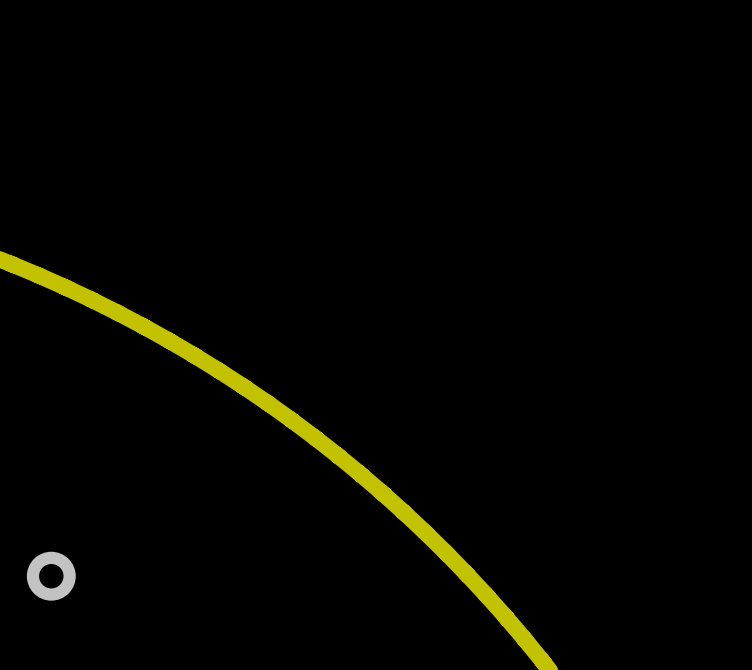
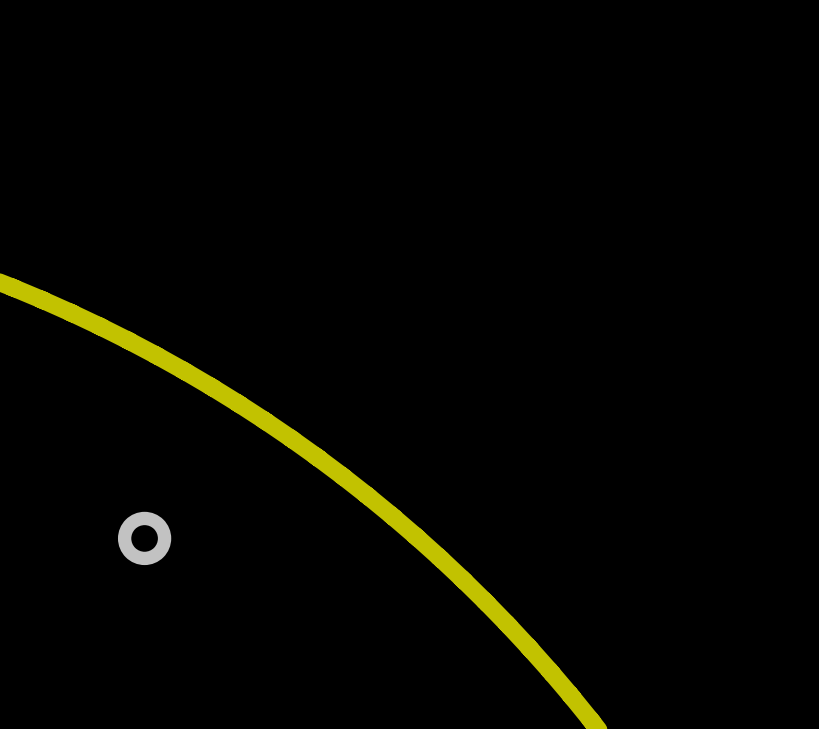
via position: (51, 576) -> (144, 538)

